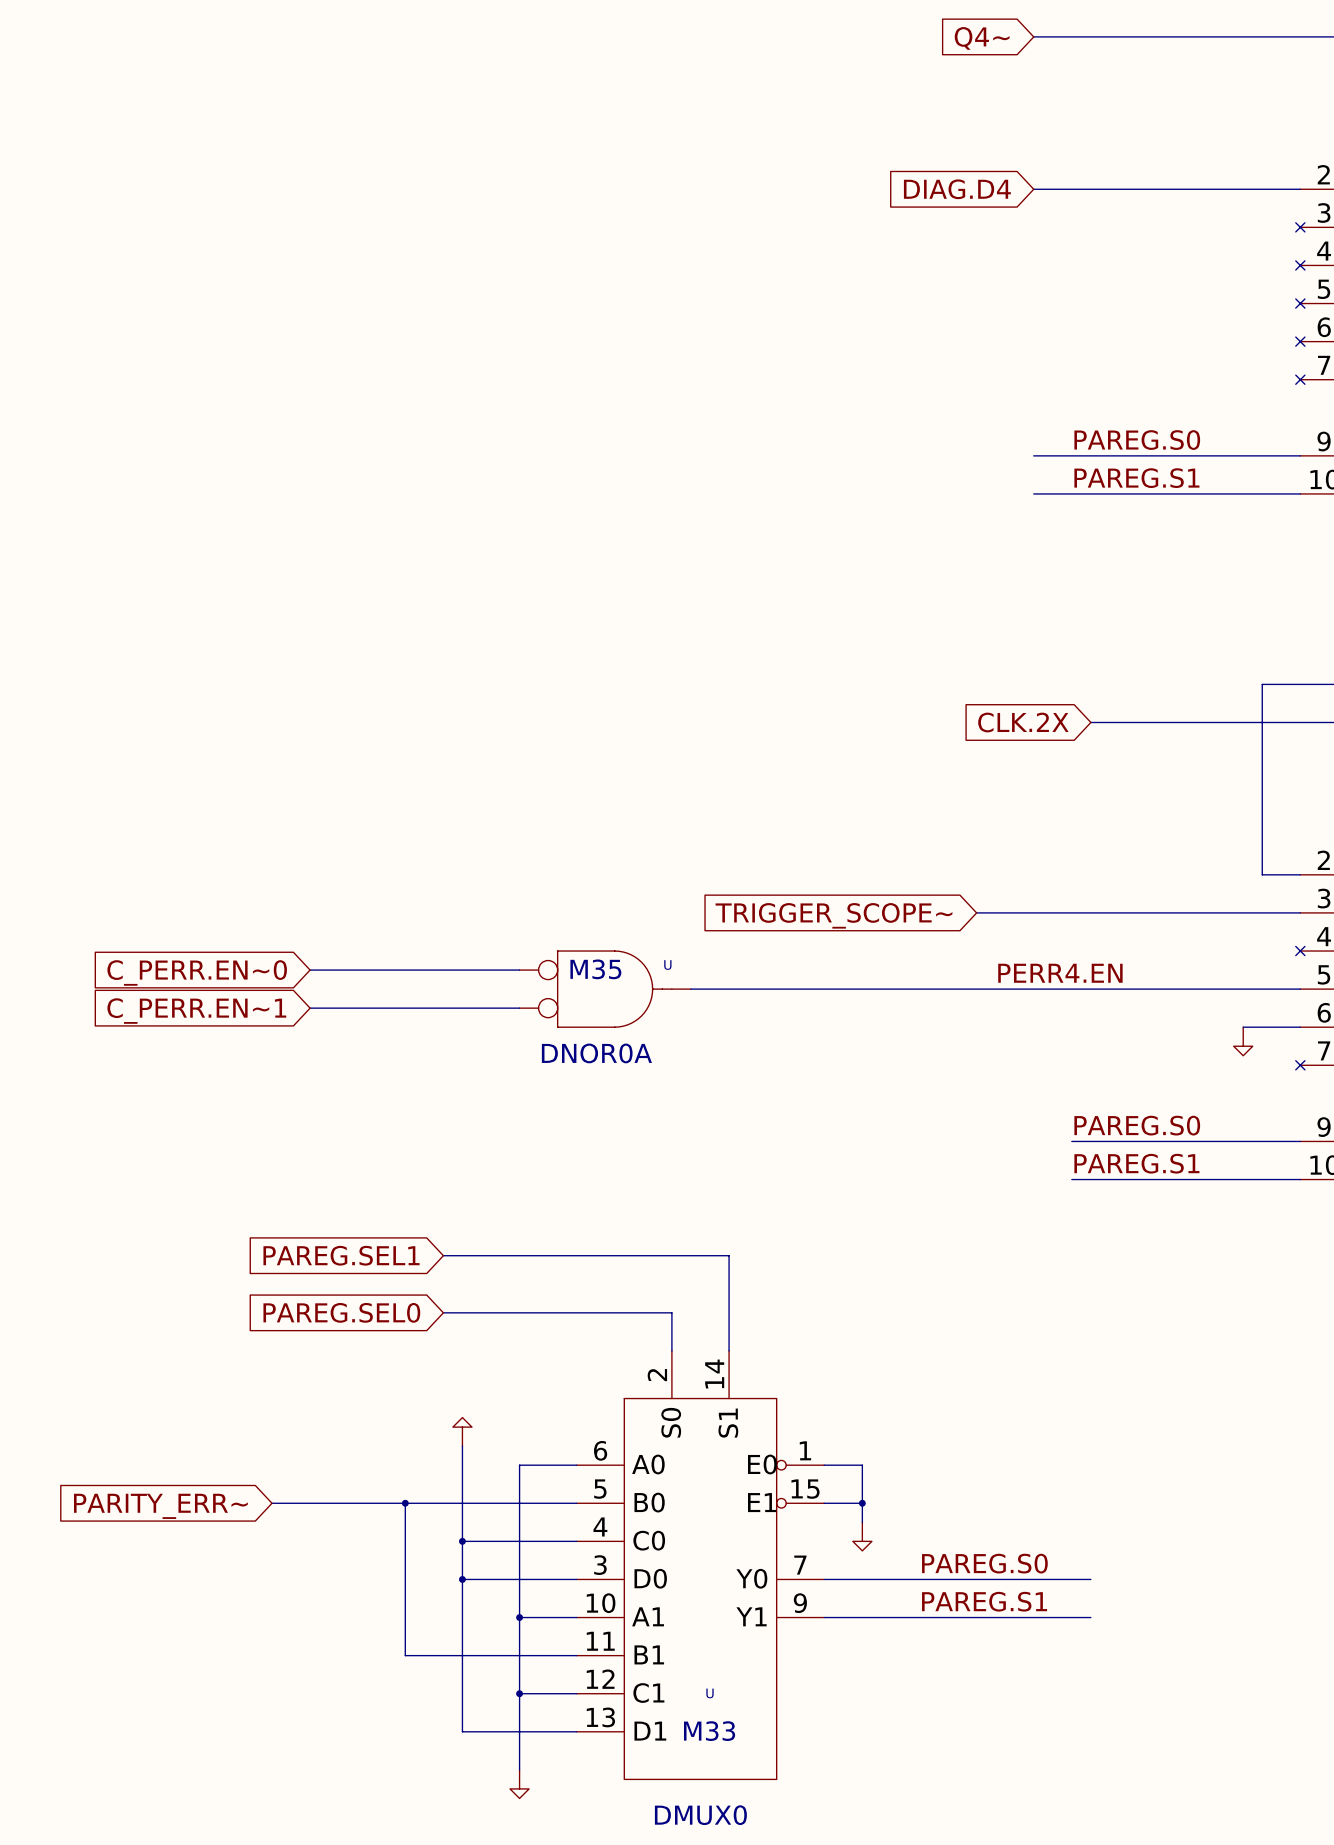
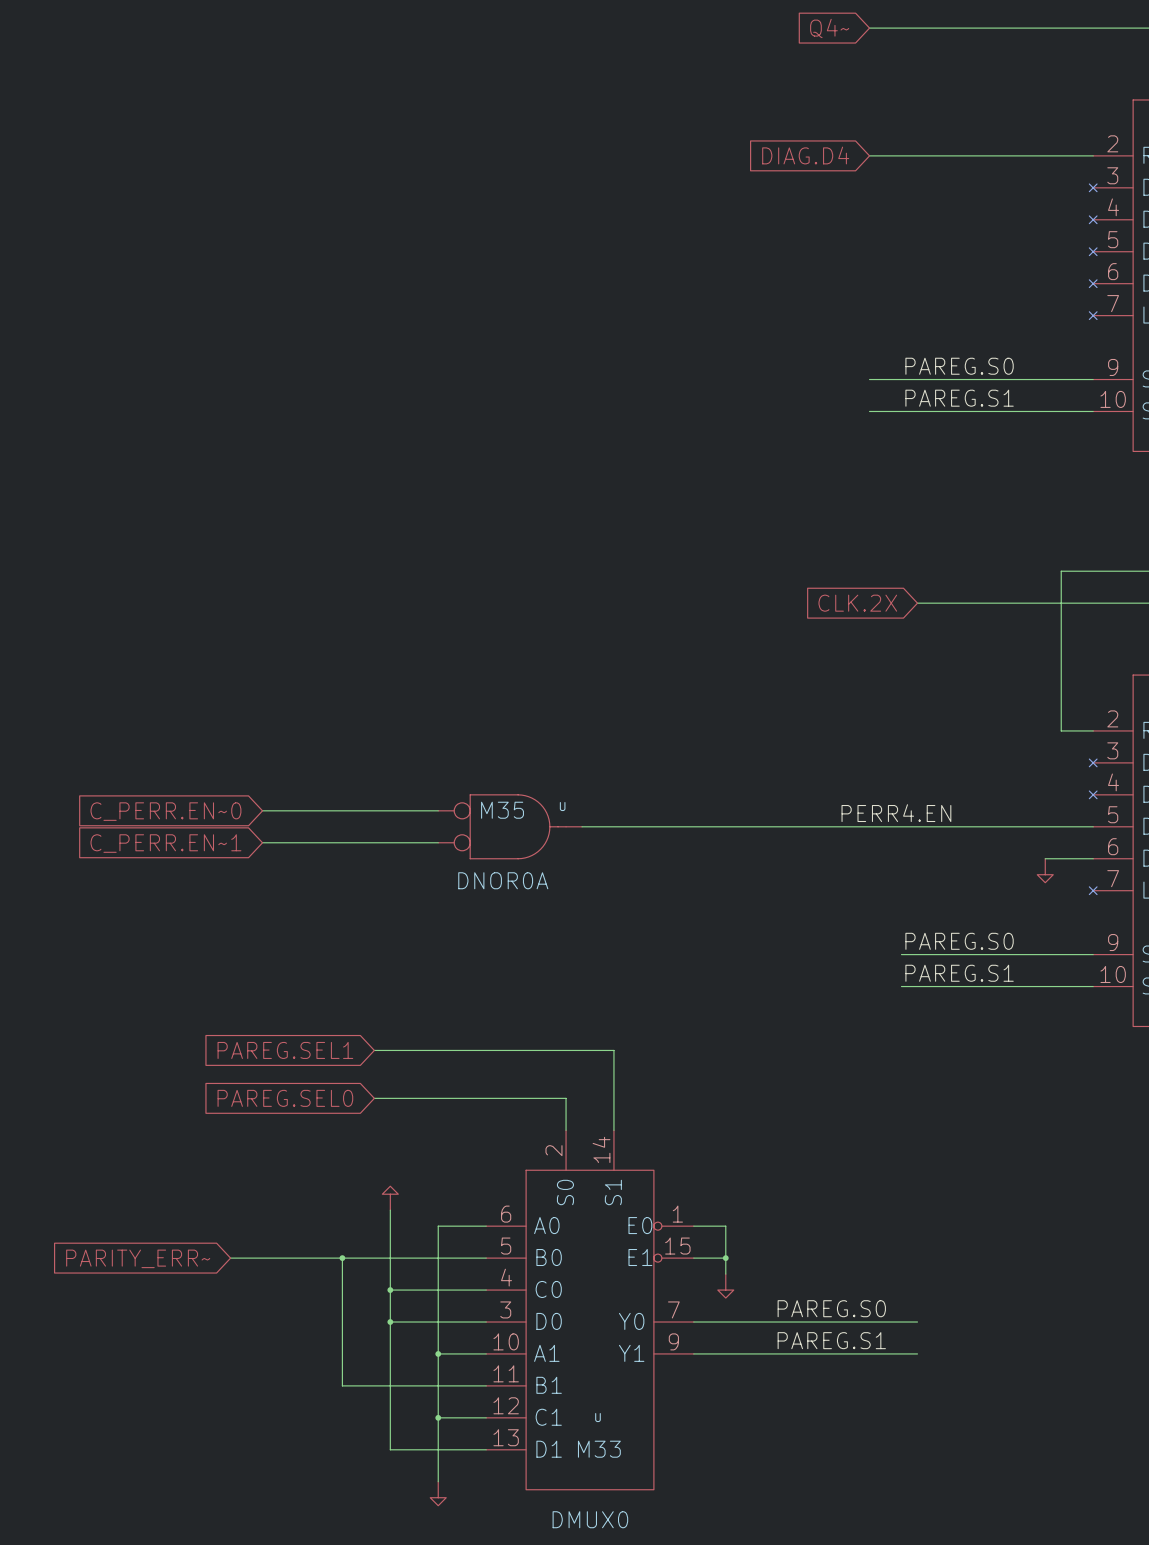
wire: (976, 912) (1300, 912) -> none
no-connect mark: none -> (1093, 762)
global label: TRIGGER_SCOPE~ (834, 915) -> none

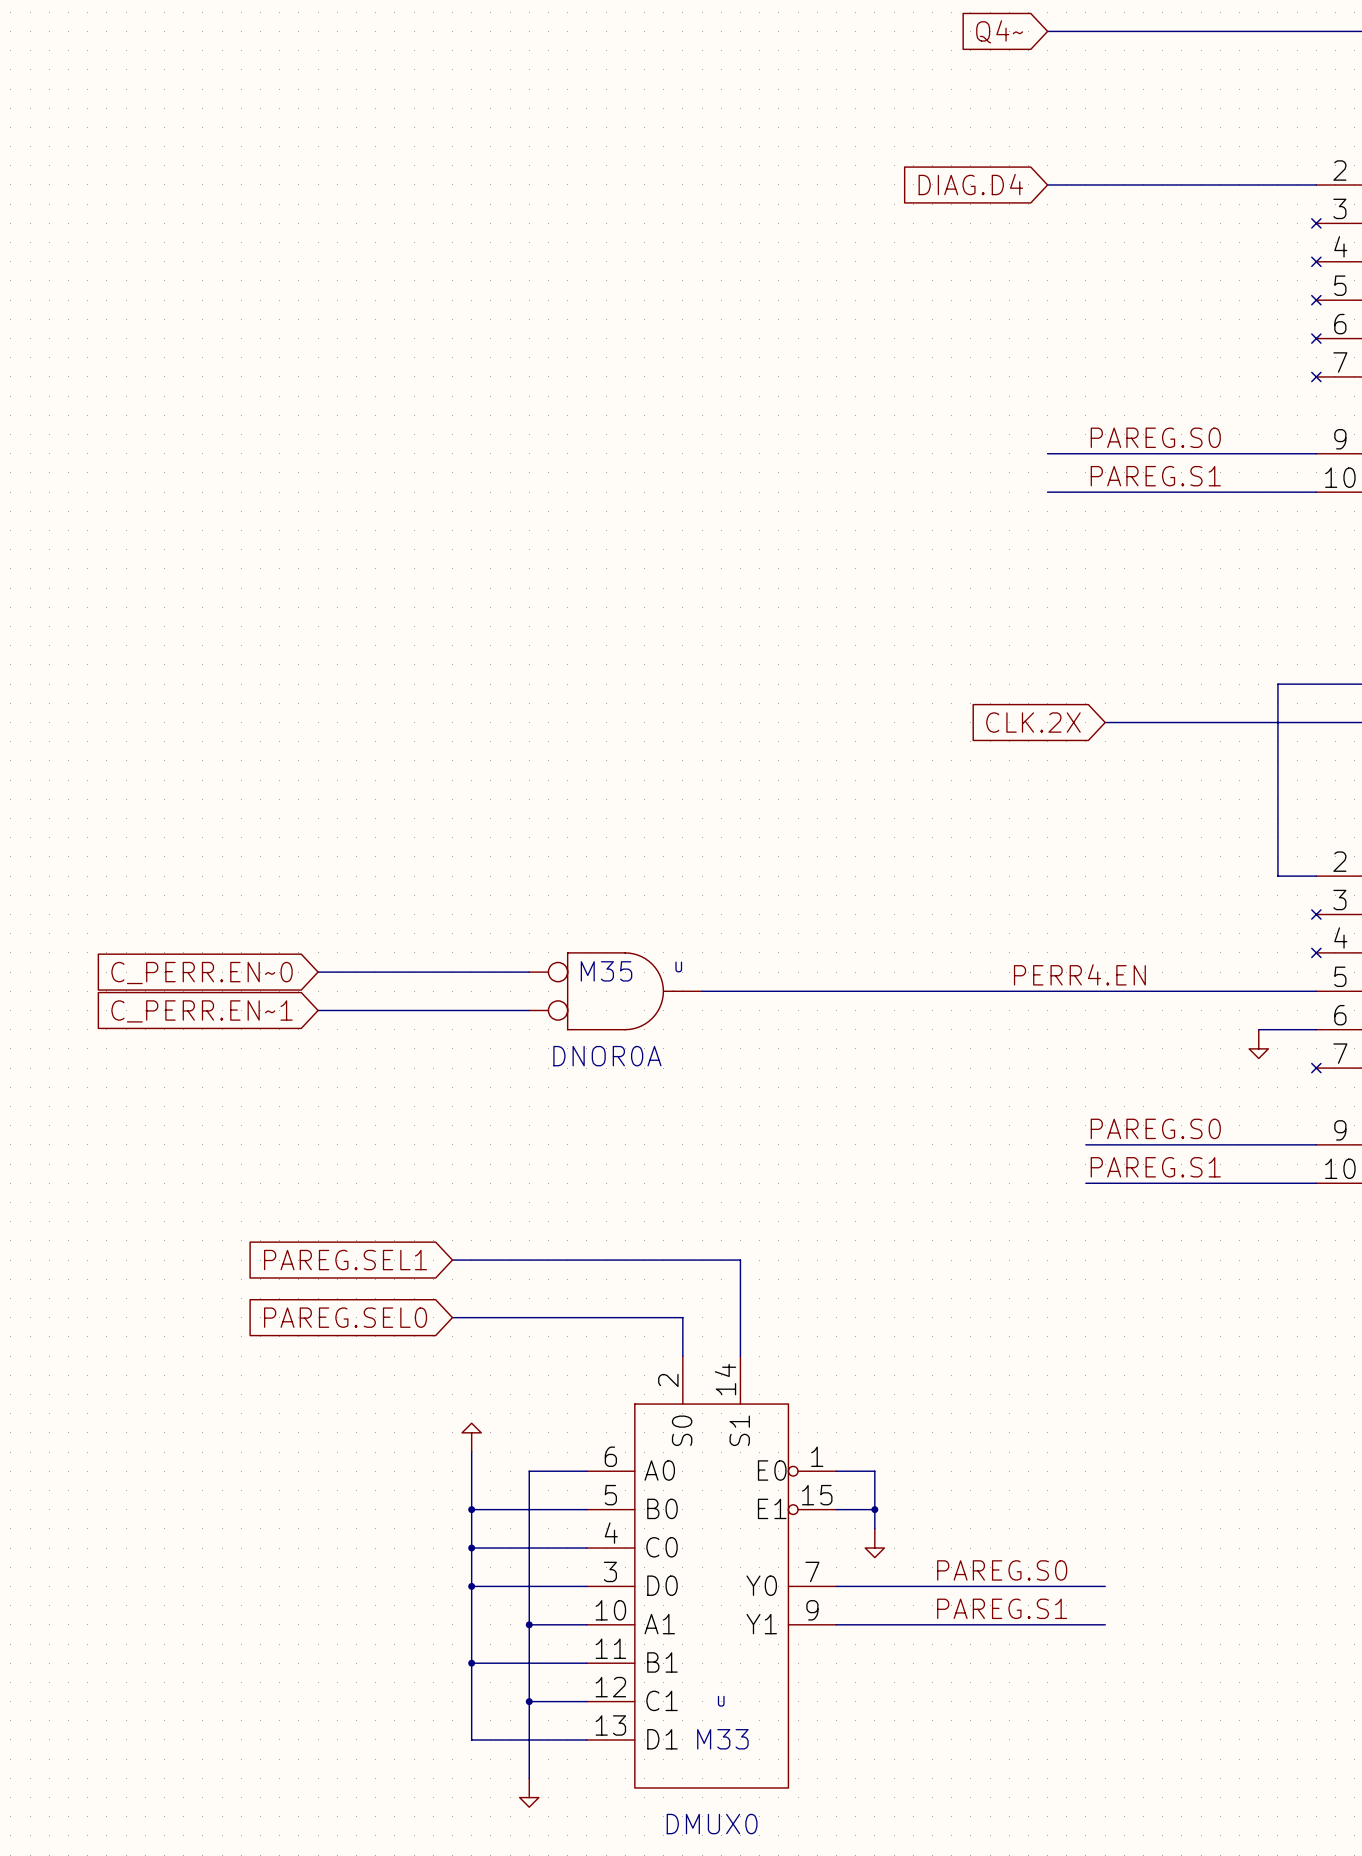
global label: PARITY_ERR~ (138, 1258) -> none
wire: (230, 1258) (390, 1258) -> none
wire: (342, 1258) (342, 1385) (390, 1385) -> none
junction: (342, 1258) -> none
junction: none -> (471, 1509)
junction: none -> (471, 1663)

